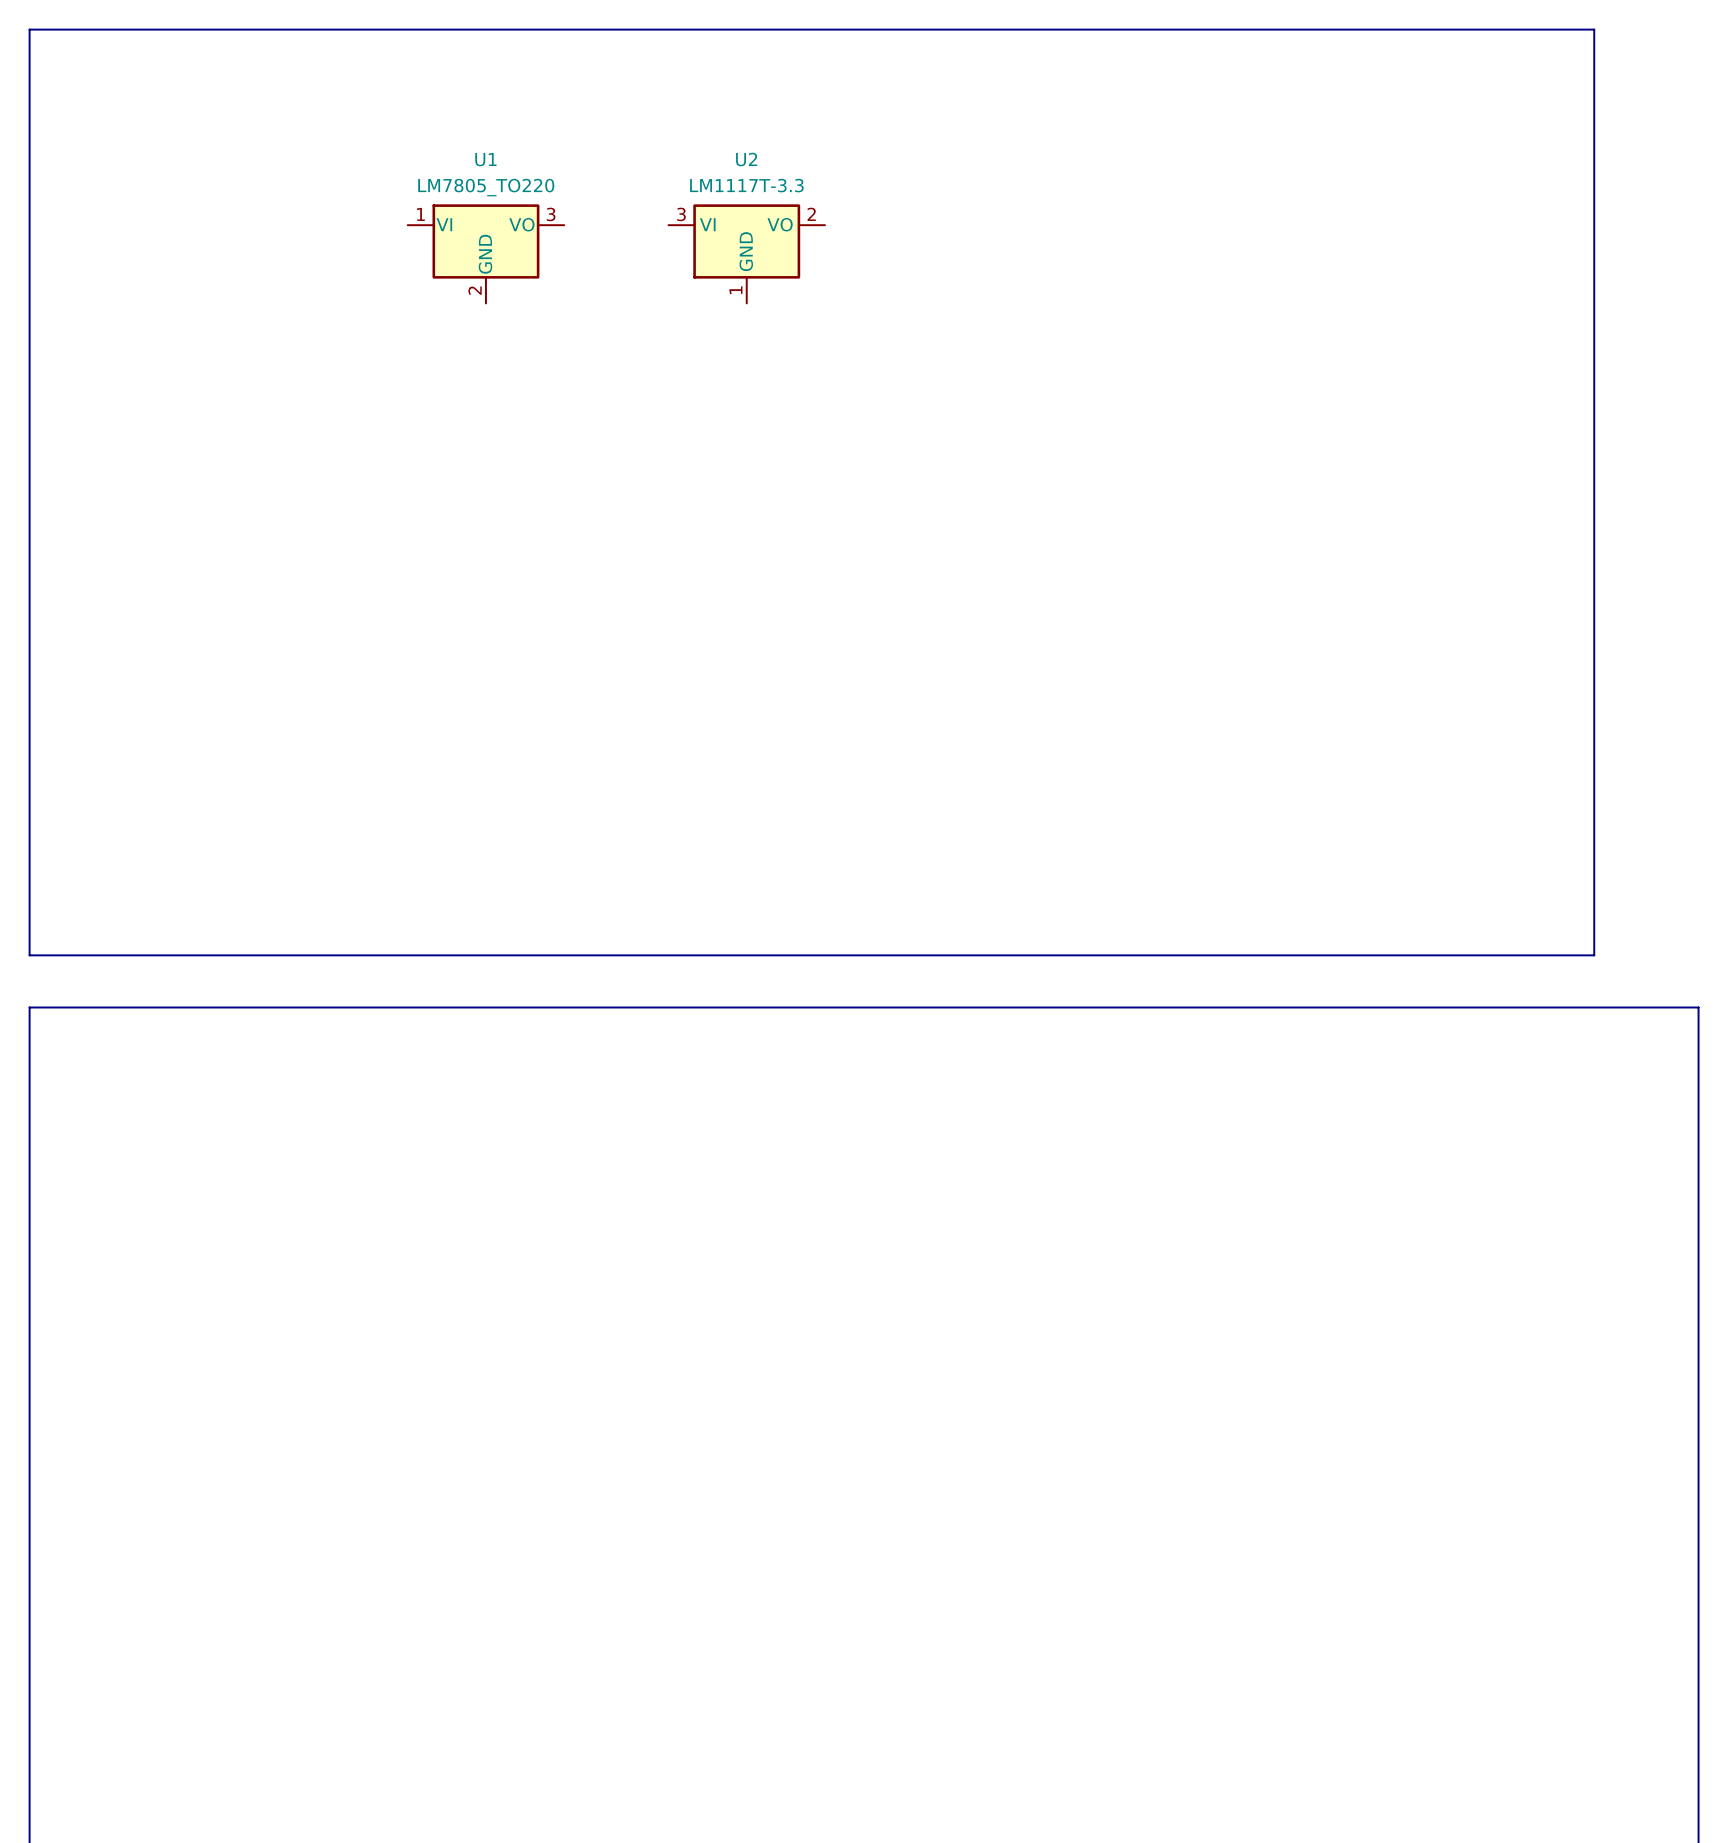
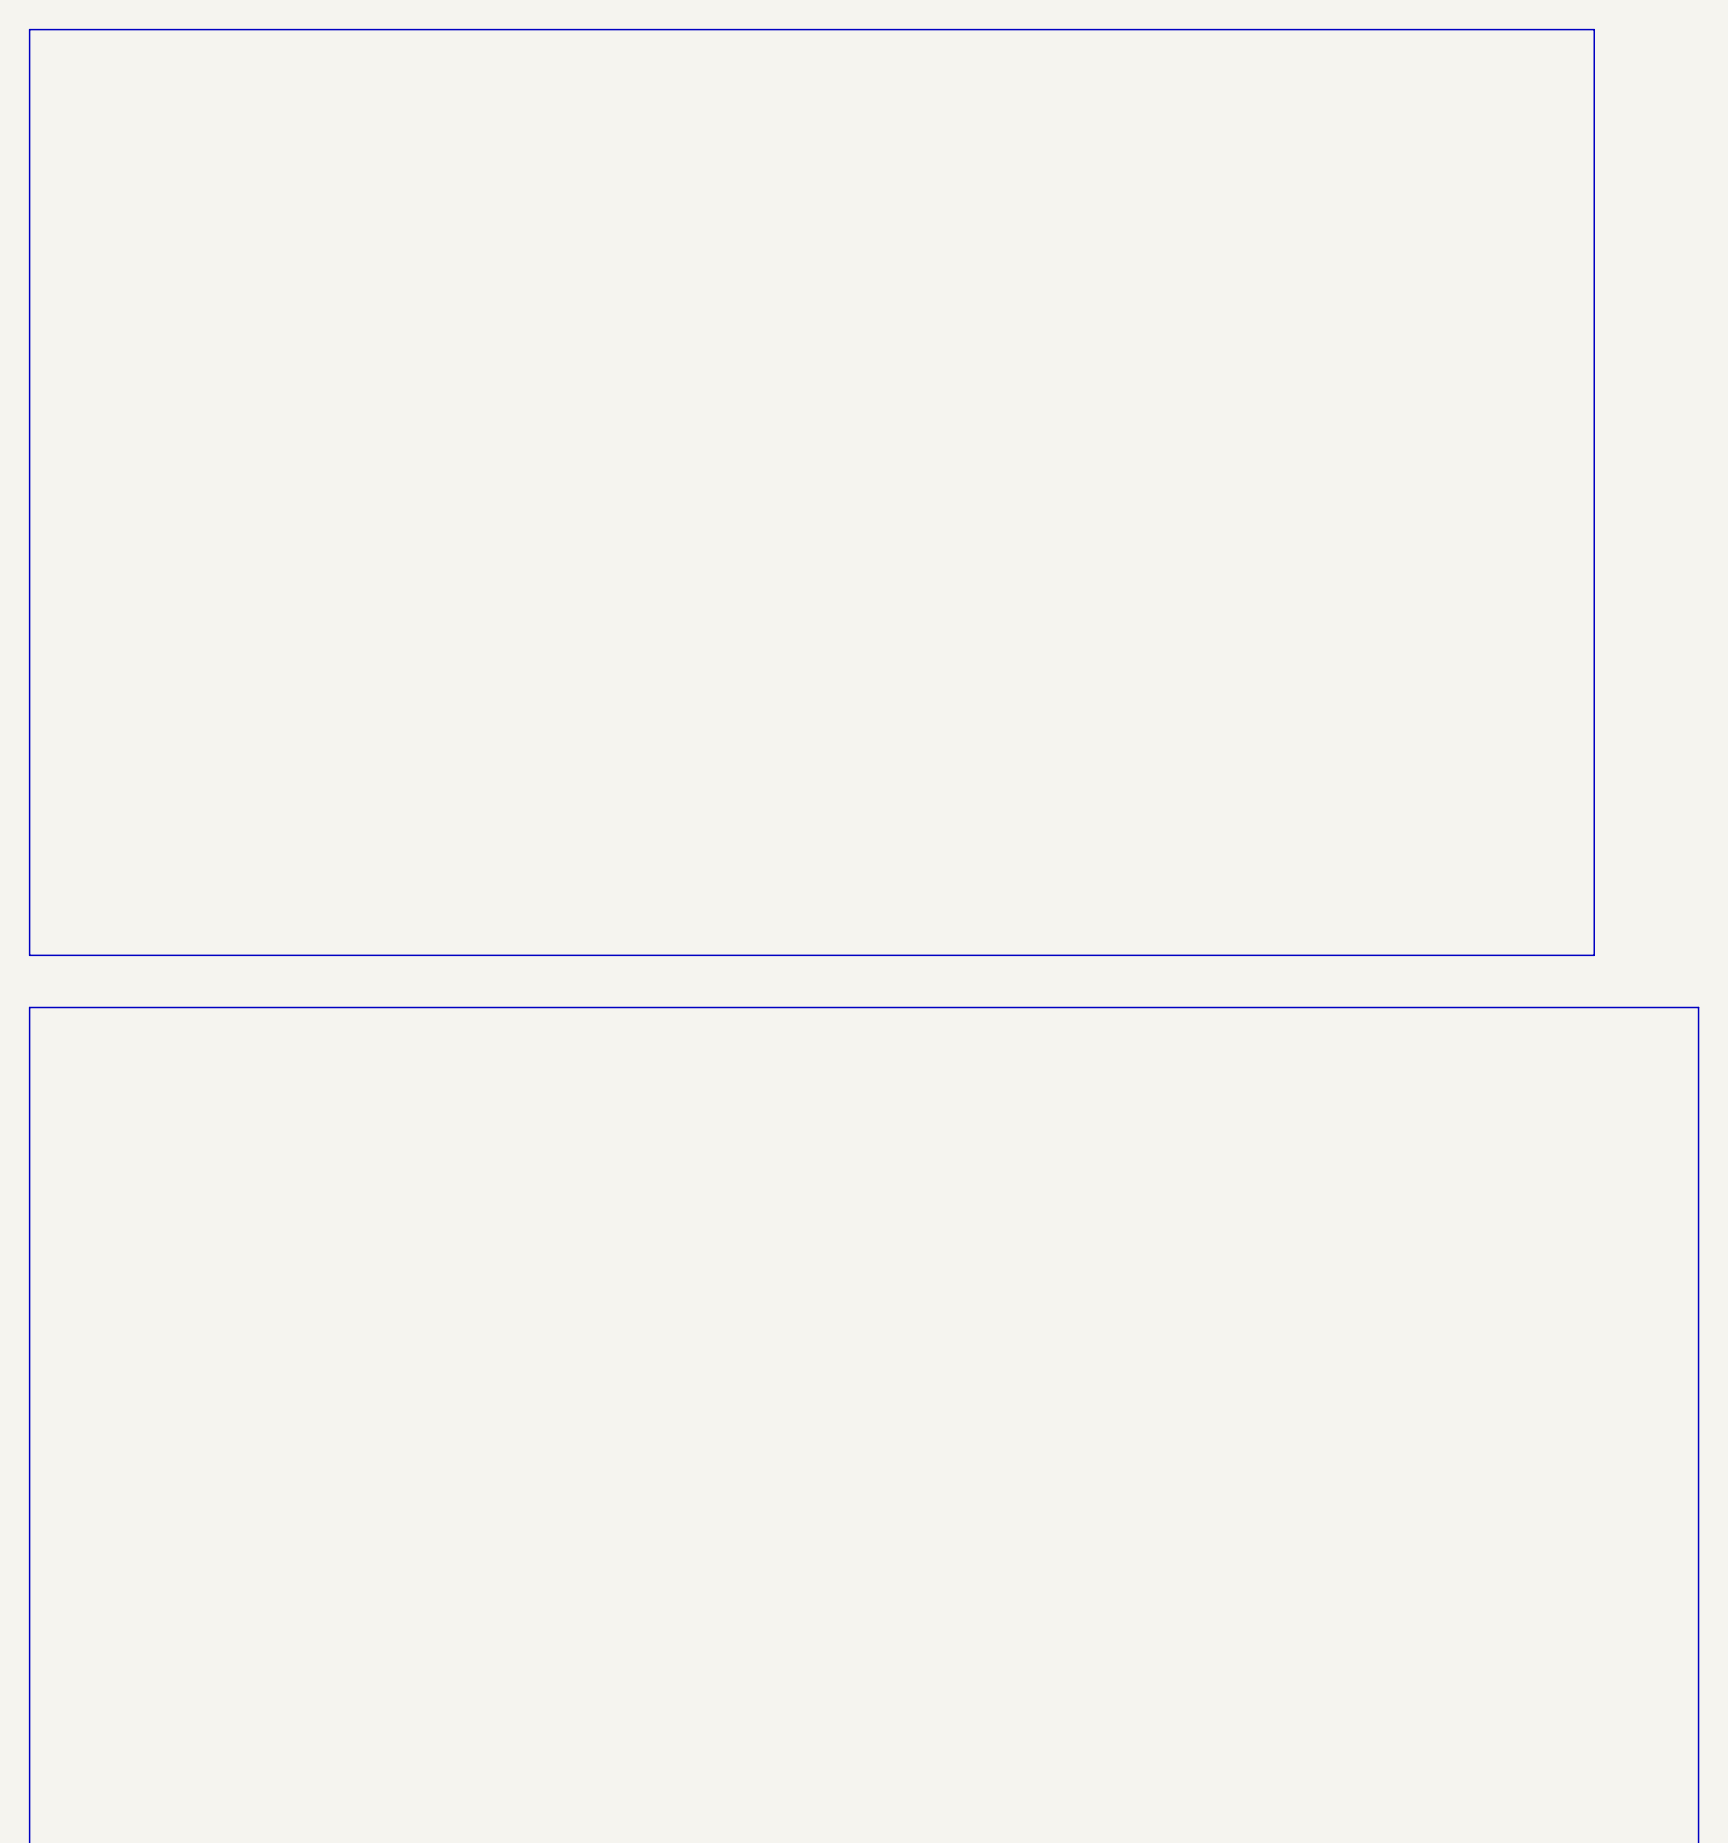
U1: LM7805_TO220 (485, 253) -> none
U2: LM1117T-3.3 (746, 253) -> none

